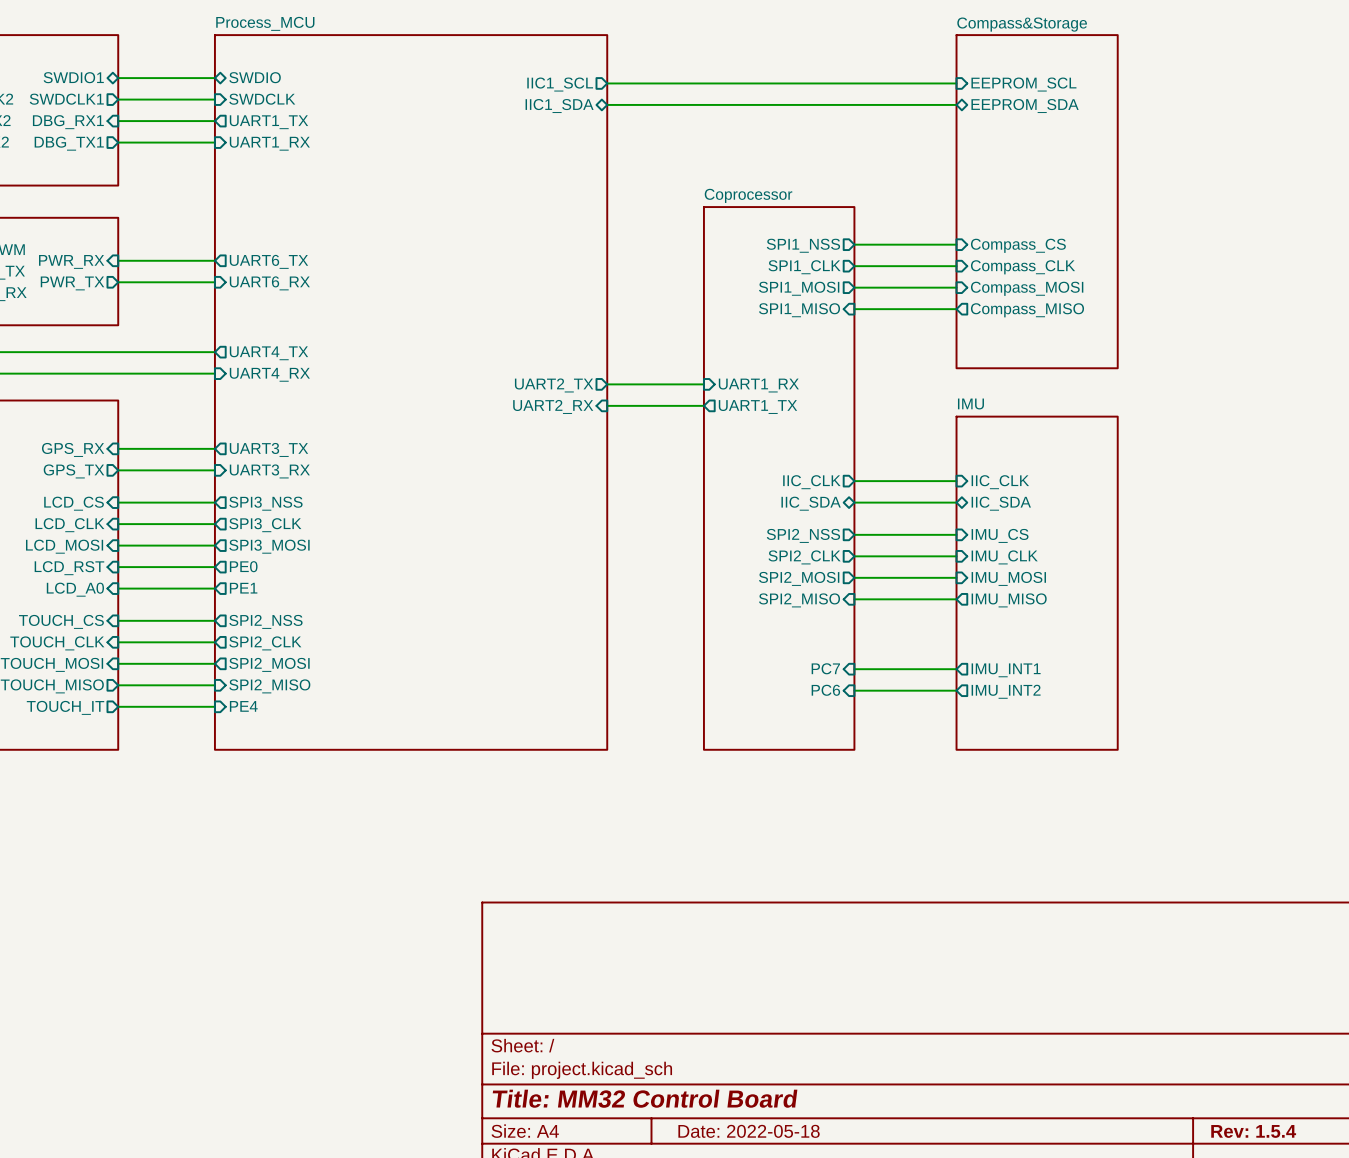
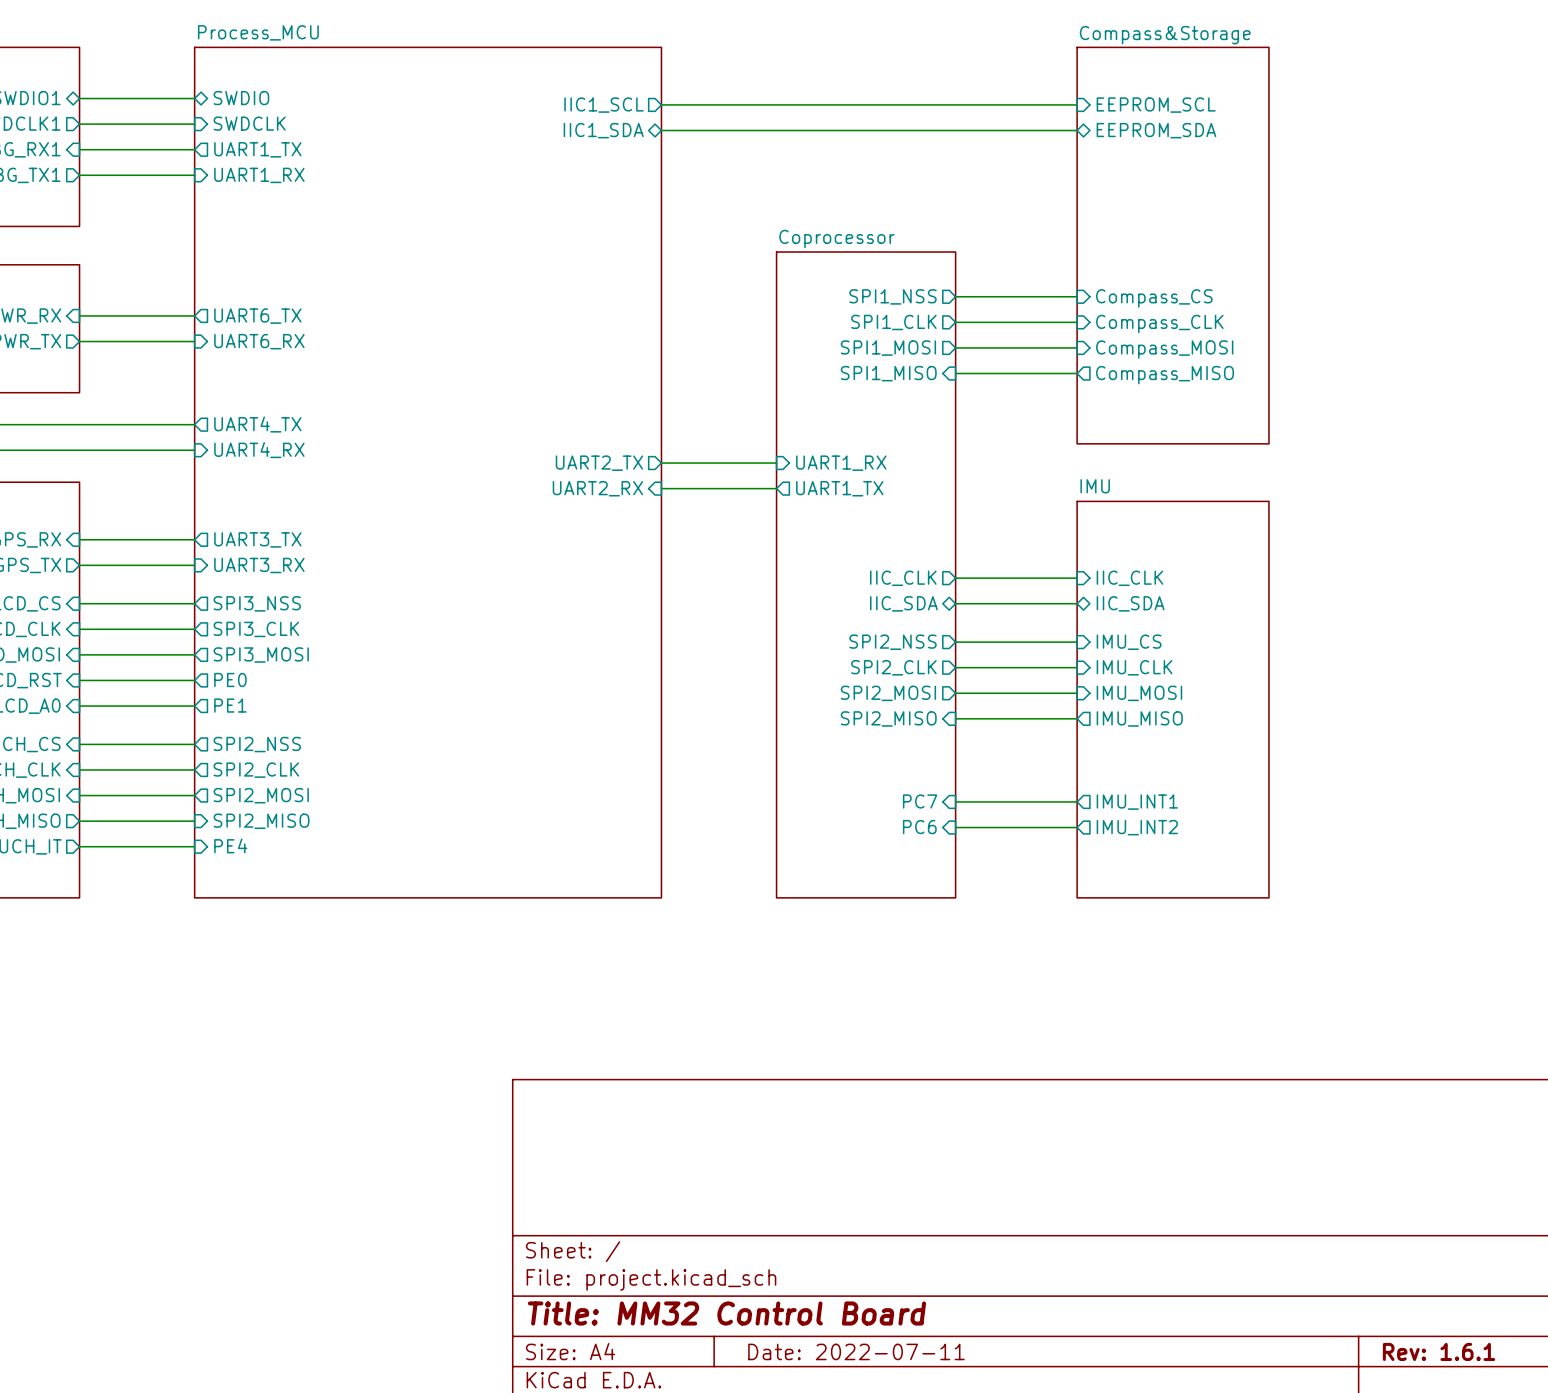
title block: Date: 2022-05-18 (749, 1131) -> Date: 2022-07-11 (856, 1351)
title block: Rev: 1.5.4 (1253, 1131) -> Rev: 1.6.1 (1439, 1351)

